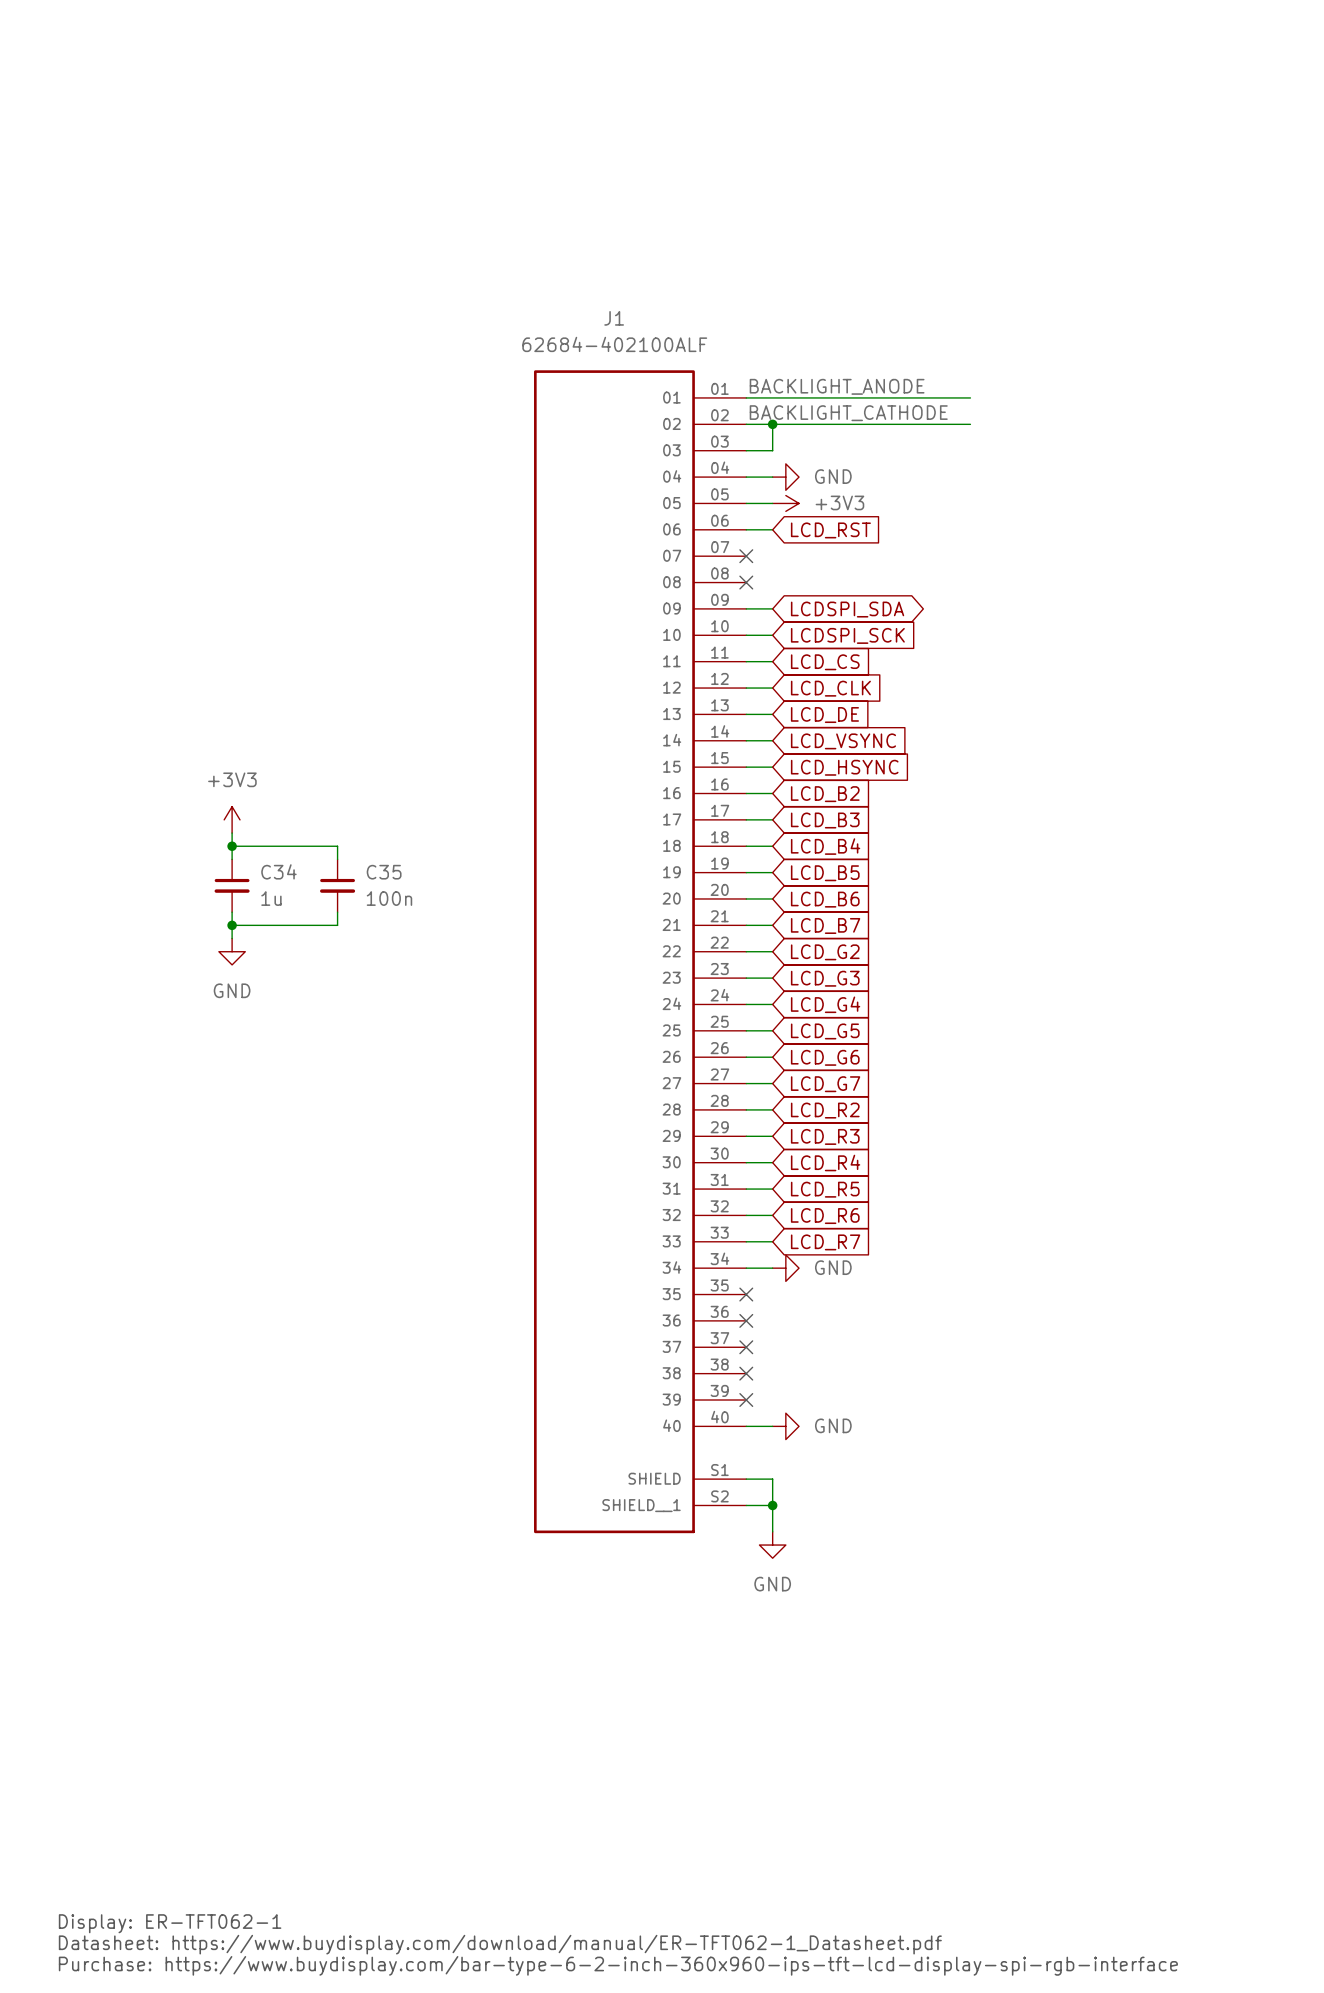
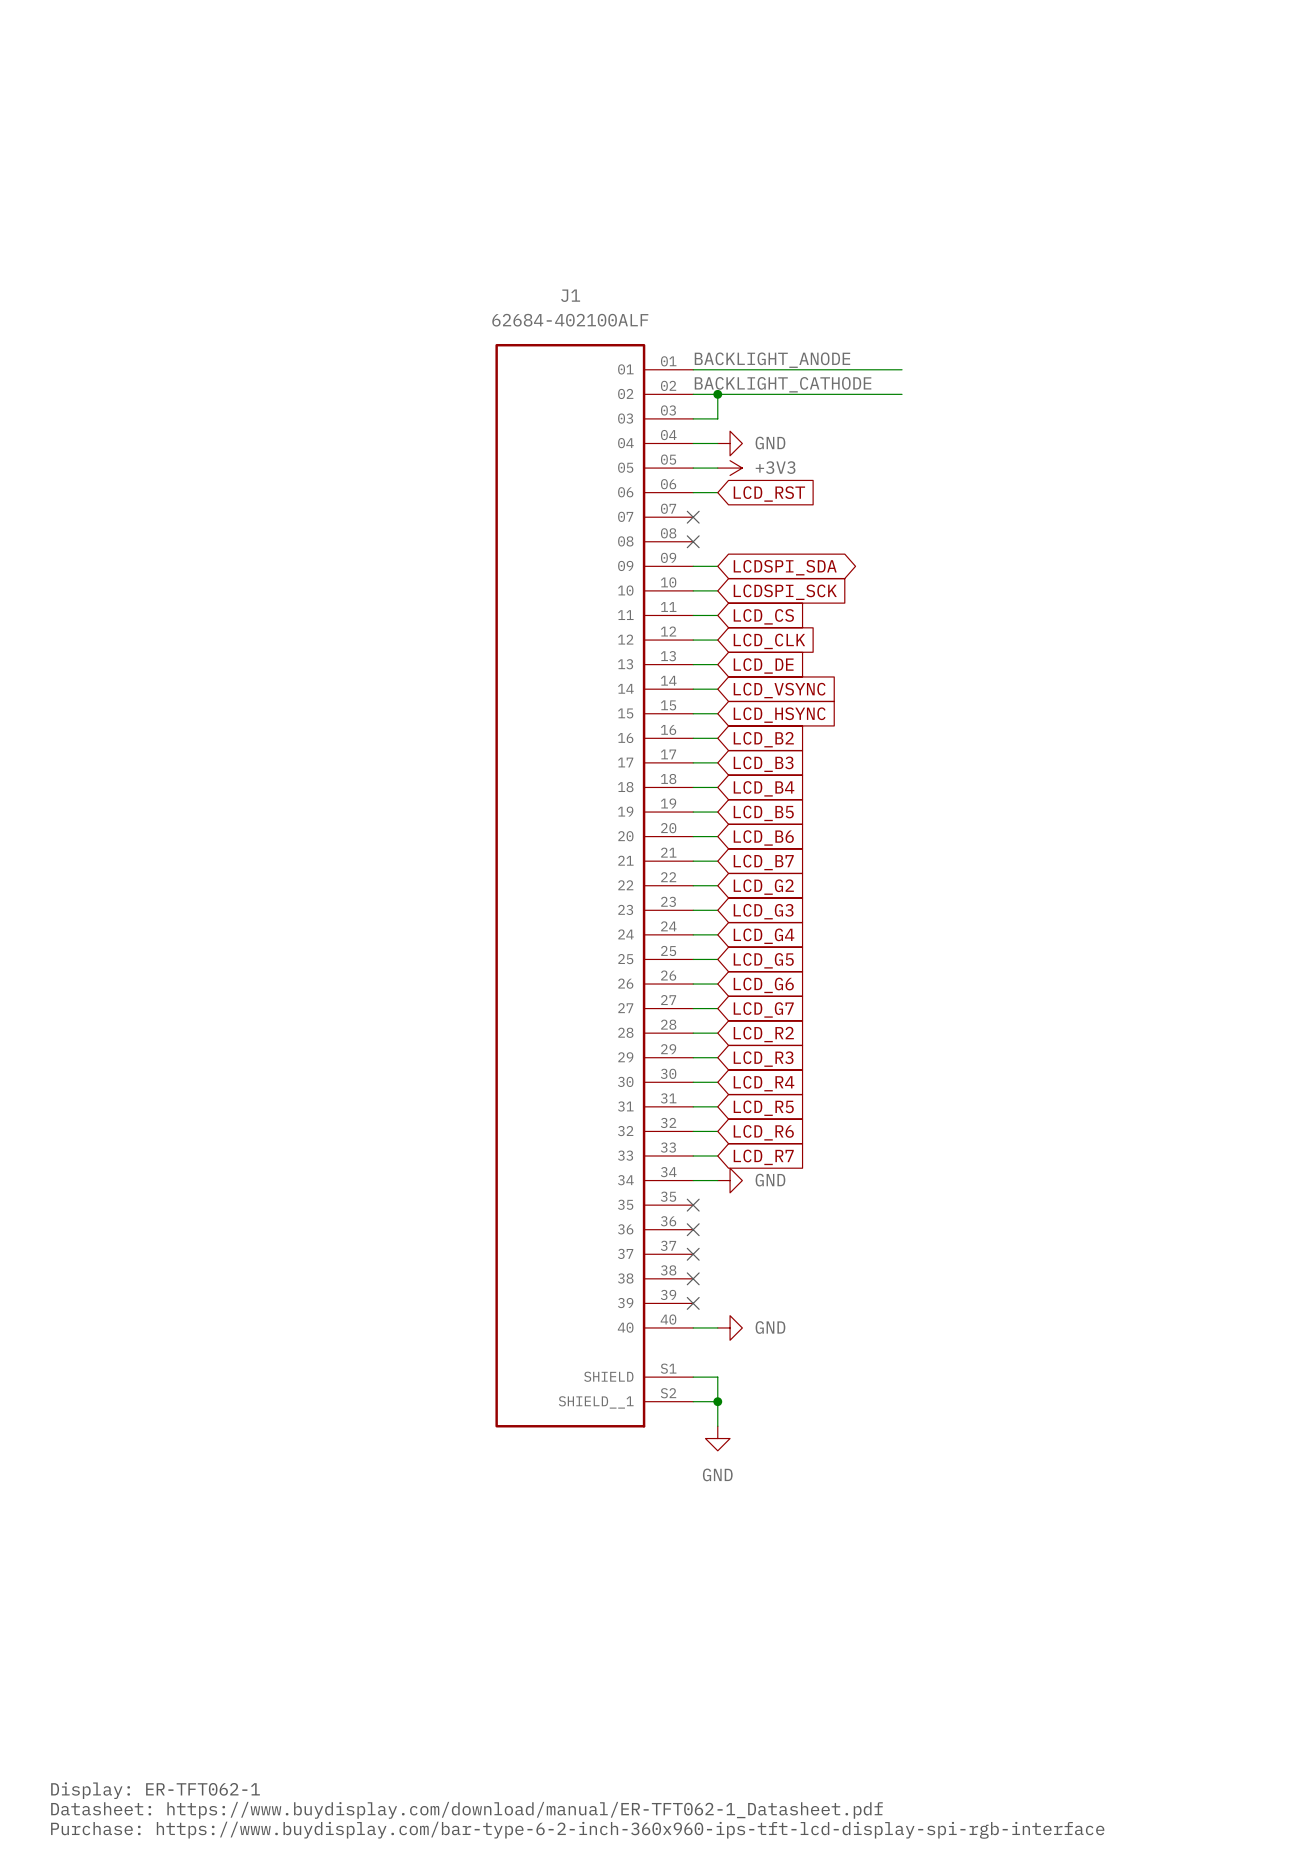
power symbol: +3V3 (232, 819) -> none
wire: (232, 833) (232, 859) -> none
wire: (232, 846) (337, 846) (337, 859) -> none
junction: (232, 846) -> none
C34: 1u (232, 885) -> none
C35: 100n (337, 885) -> none
wire: (232, 912) (232, 938) -> none
wire: (337, 912) (337, 925) (232, 925) -> none
junction: (232, 925) -> none
power symbol: GND (232, 951) -> none

